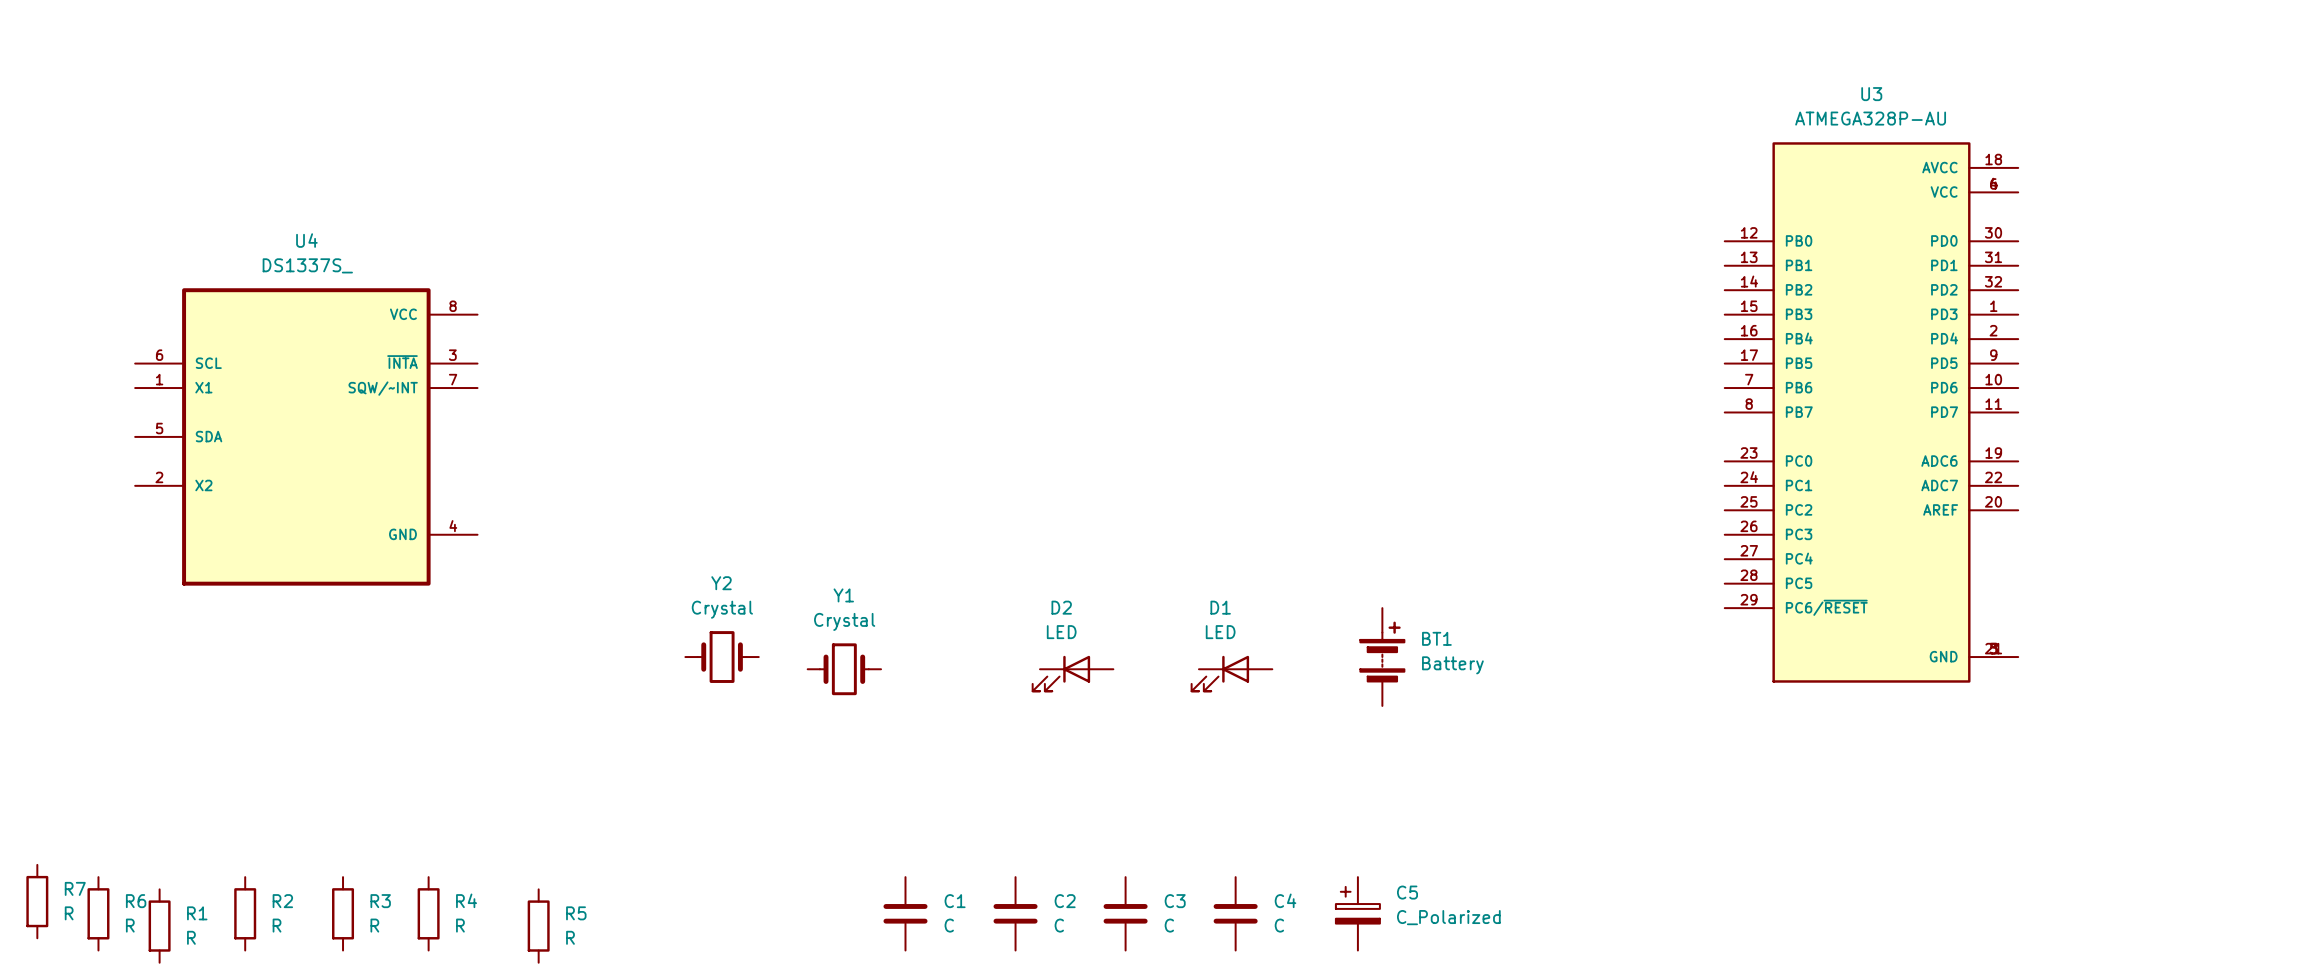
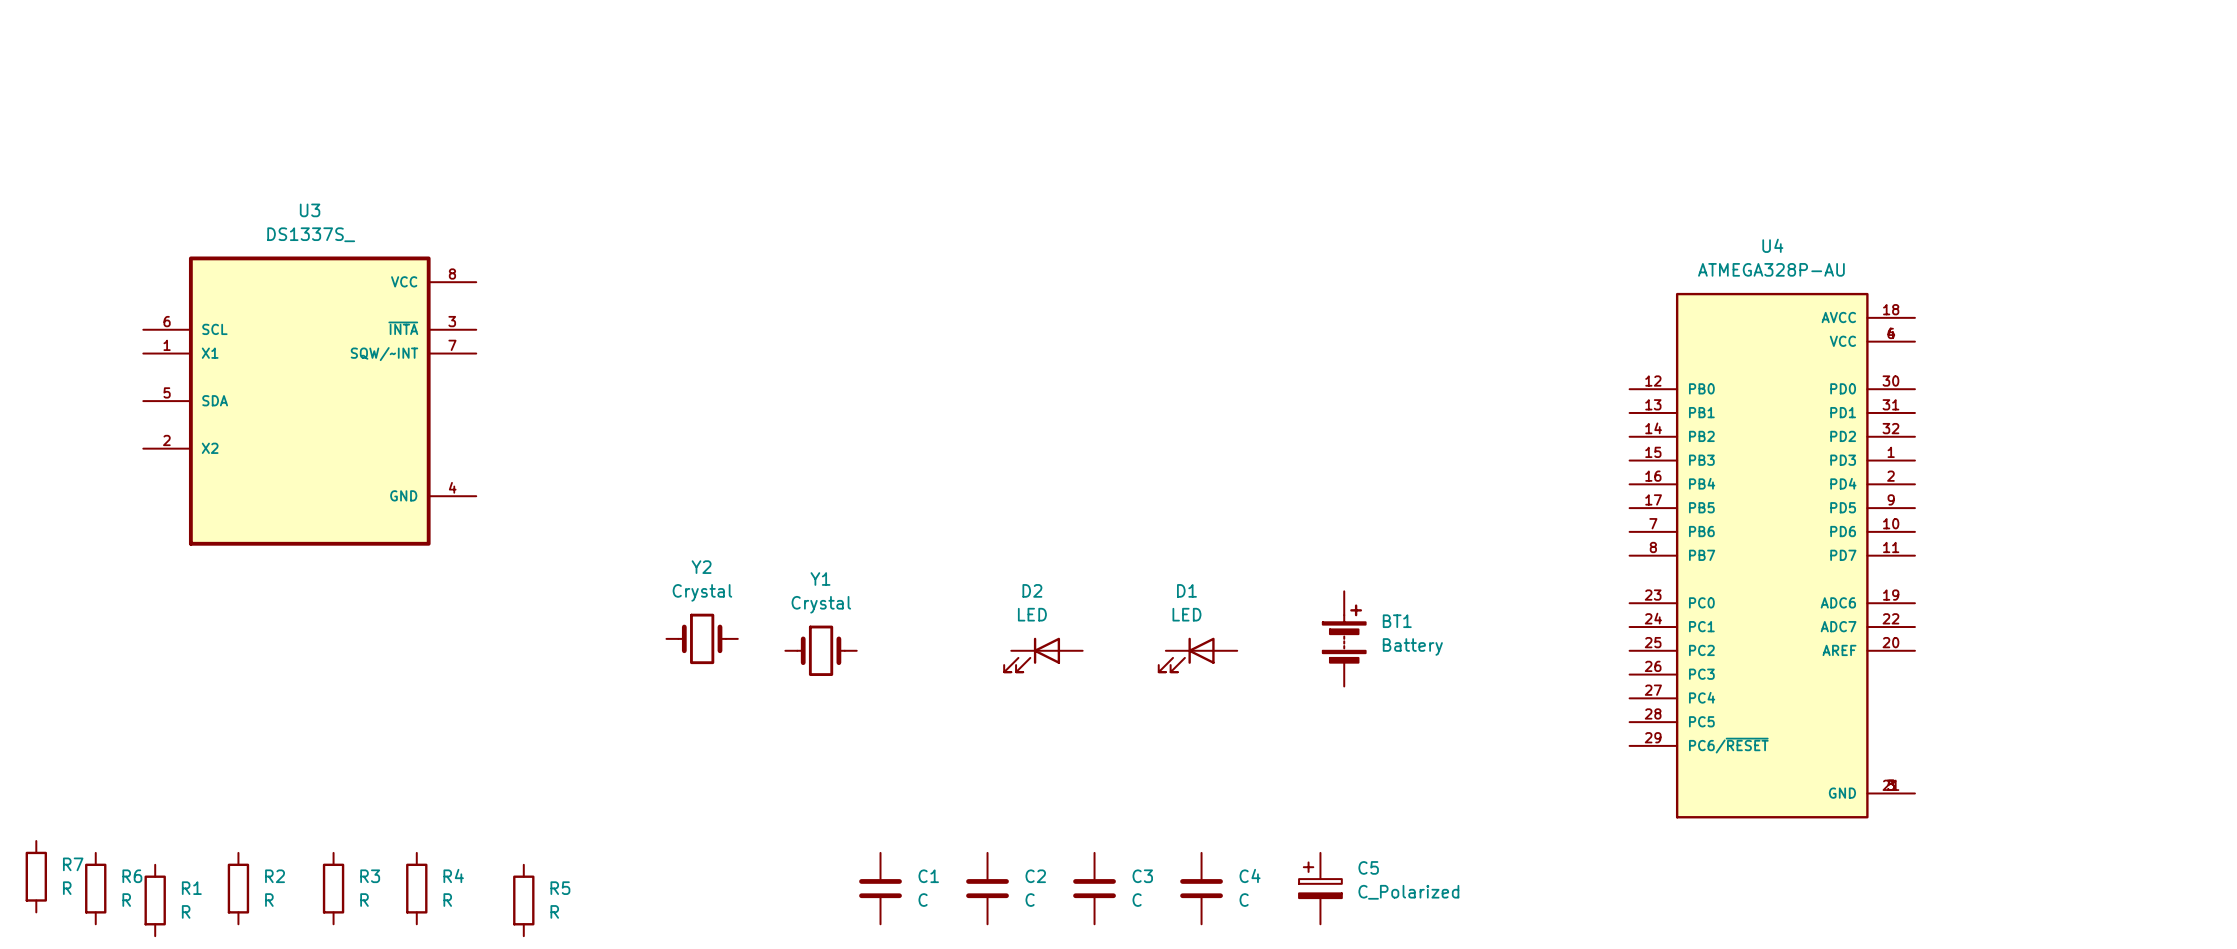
U3 name position: U3 (1871, 94) -> U3 (310, 210)
U3 value: ATMEGA328P-AU (1870, 118) -> DS1337S_ (311, 234)
U3 symbol: [1724, 142, 2019, 683] -> [143, 256, 477, 546]
U4 name position: U4 (306, 240) -> U4 (1772, 245)
U4 value: DS1337S_ (307, 265) -> ATMEGA328P-AU (1771, 269)
U4 symbol: [135, 288, 478, 586] -> [1629, 292, 1915, 819]

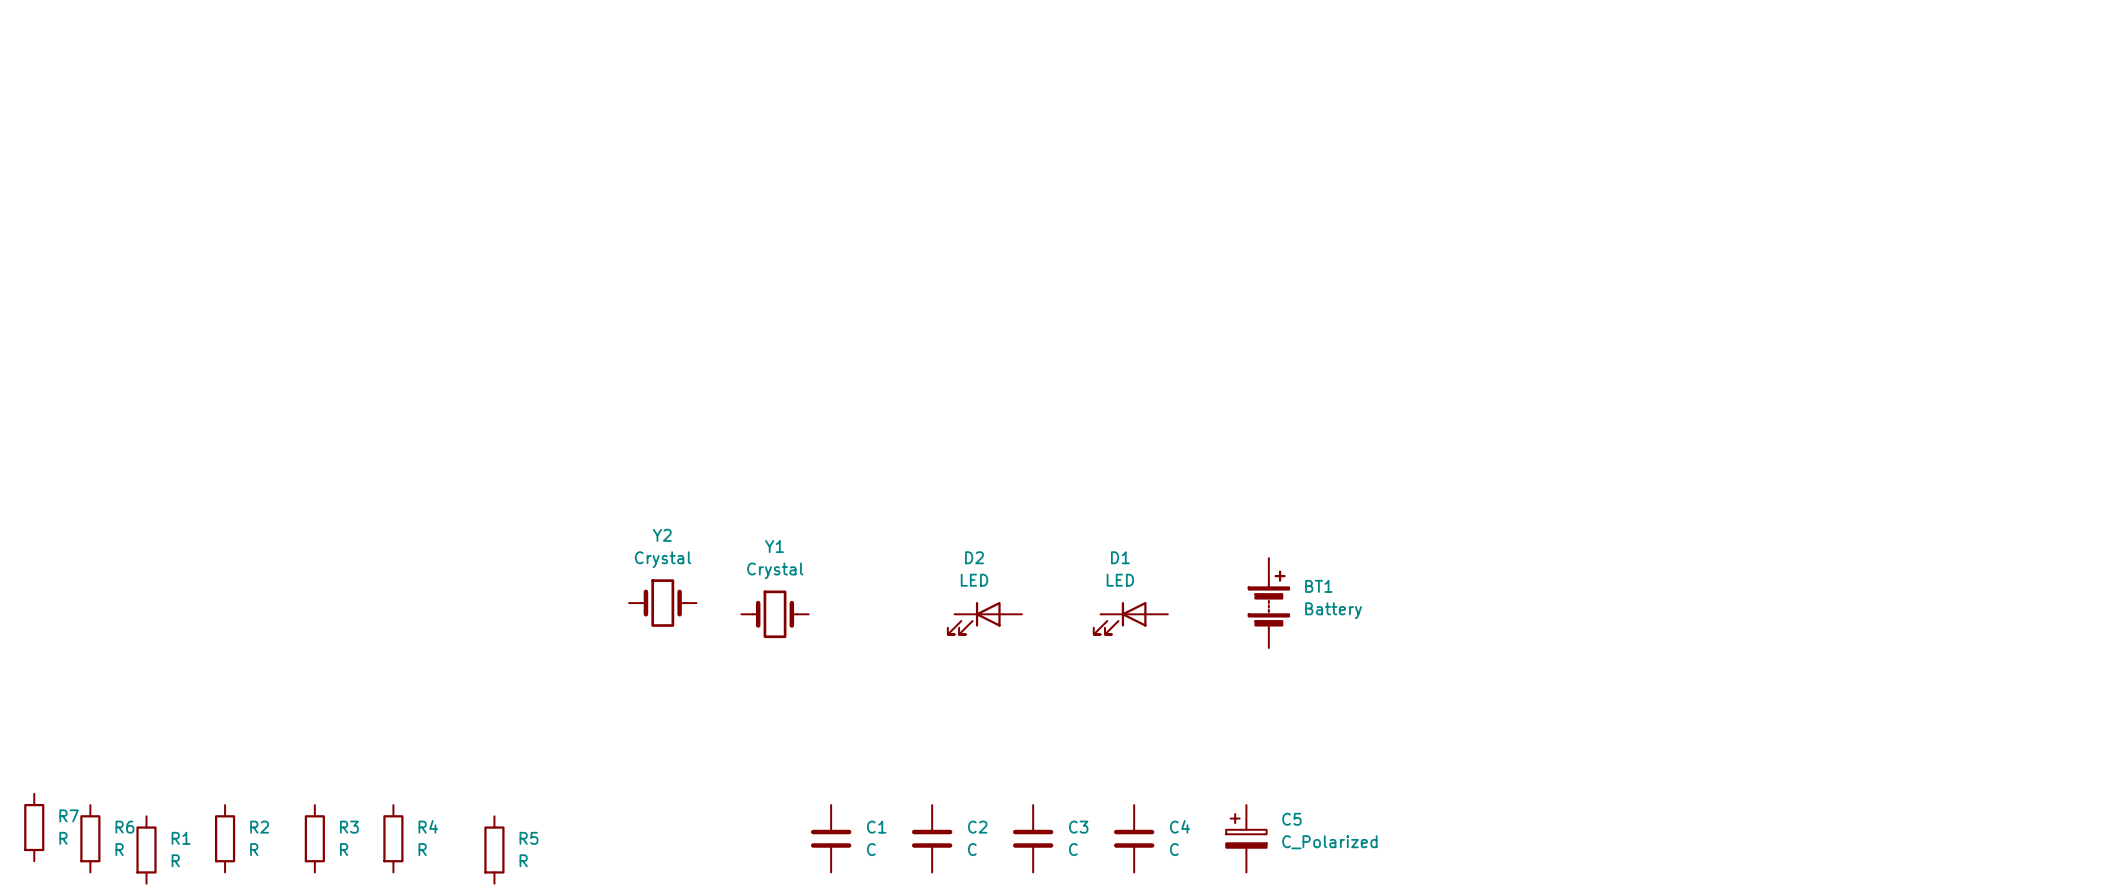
U3: DS1337S_ (309, 401) -> none
U4: ATMEGA328P-AU (1772, 555) -> none

